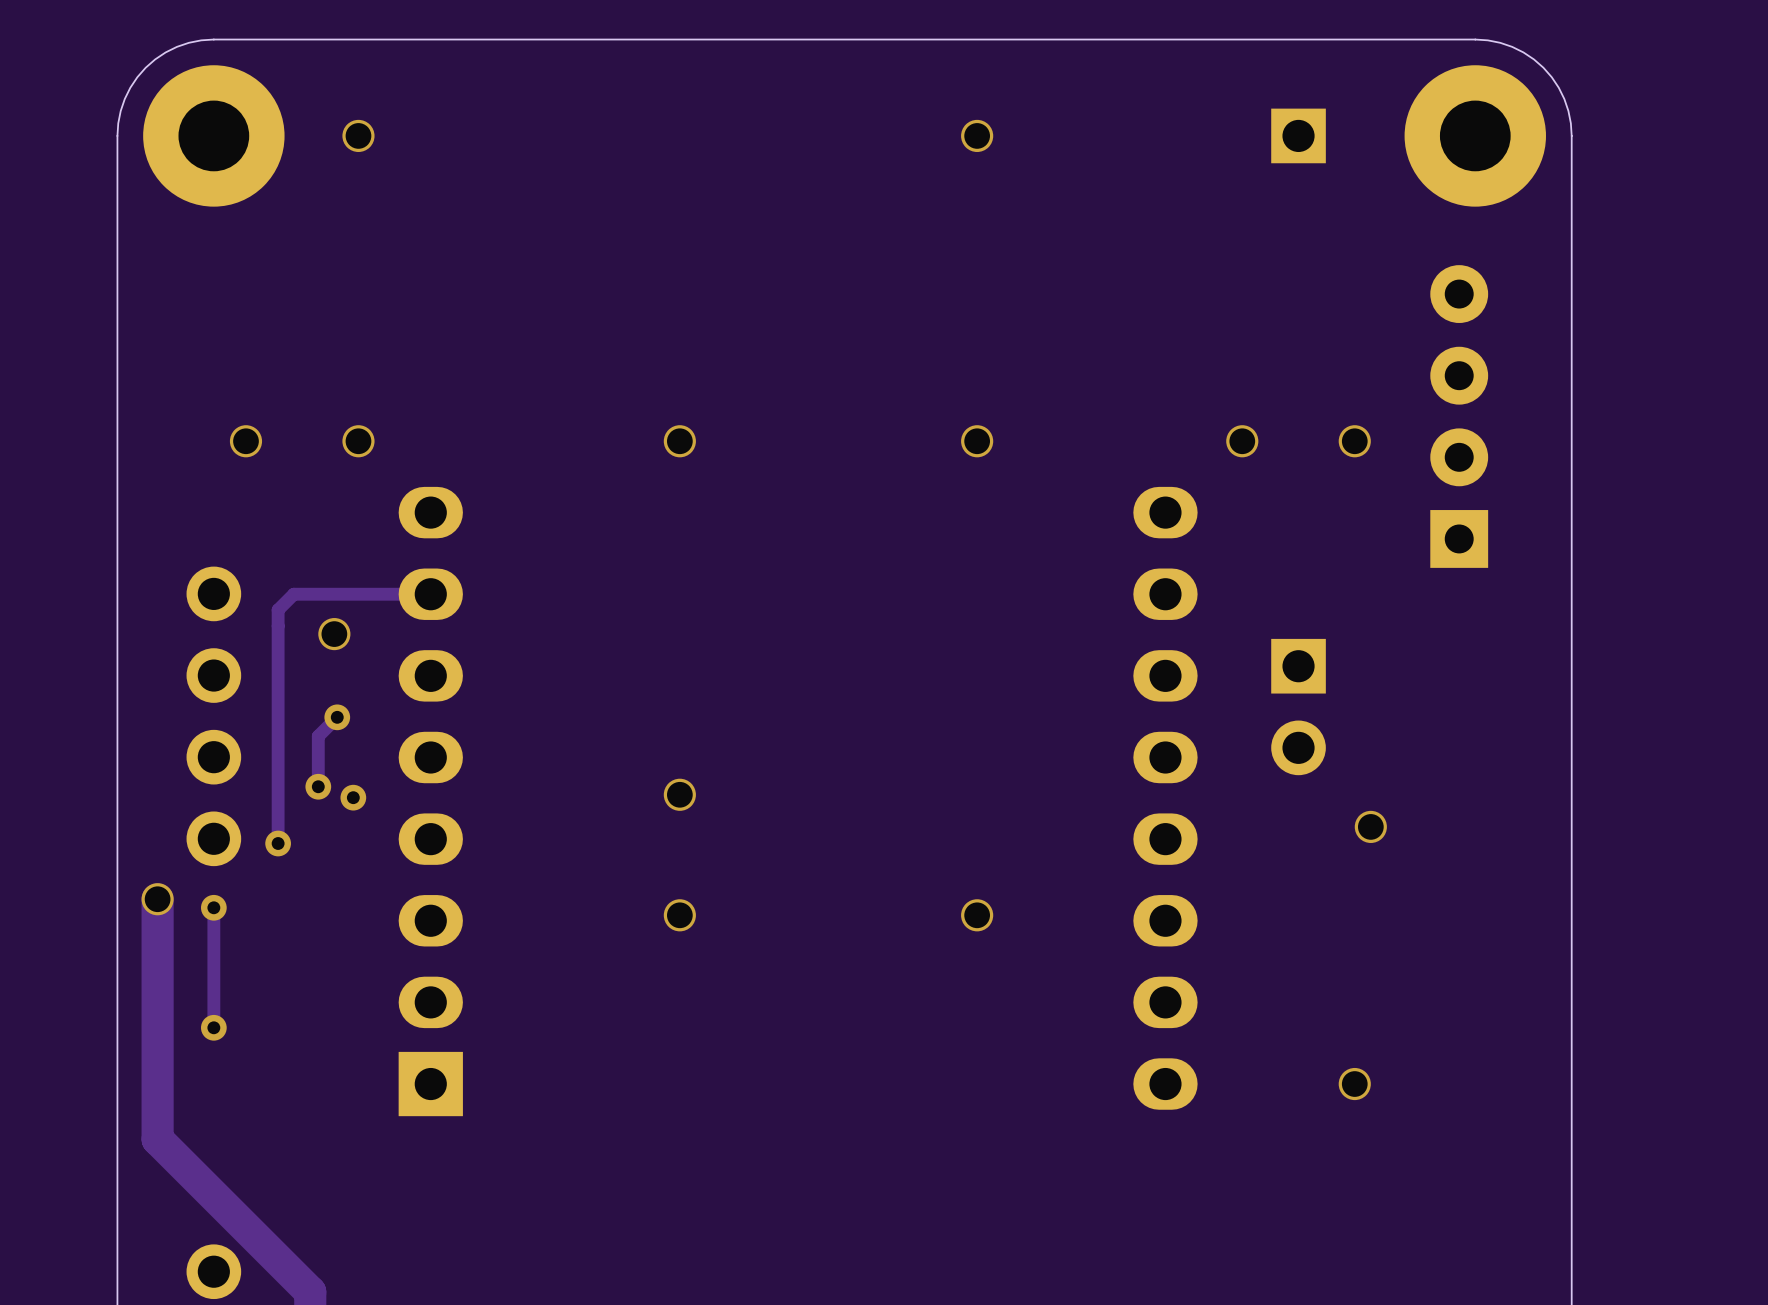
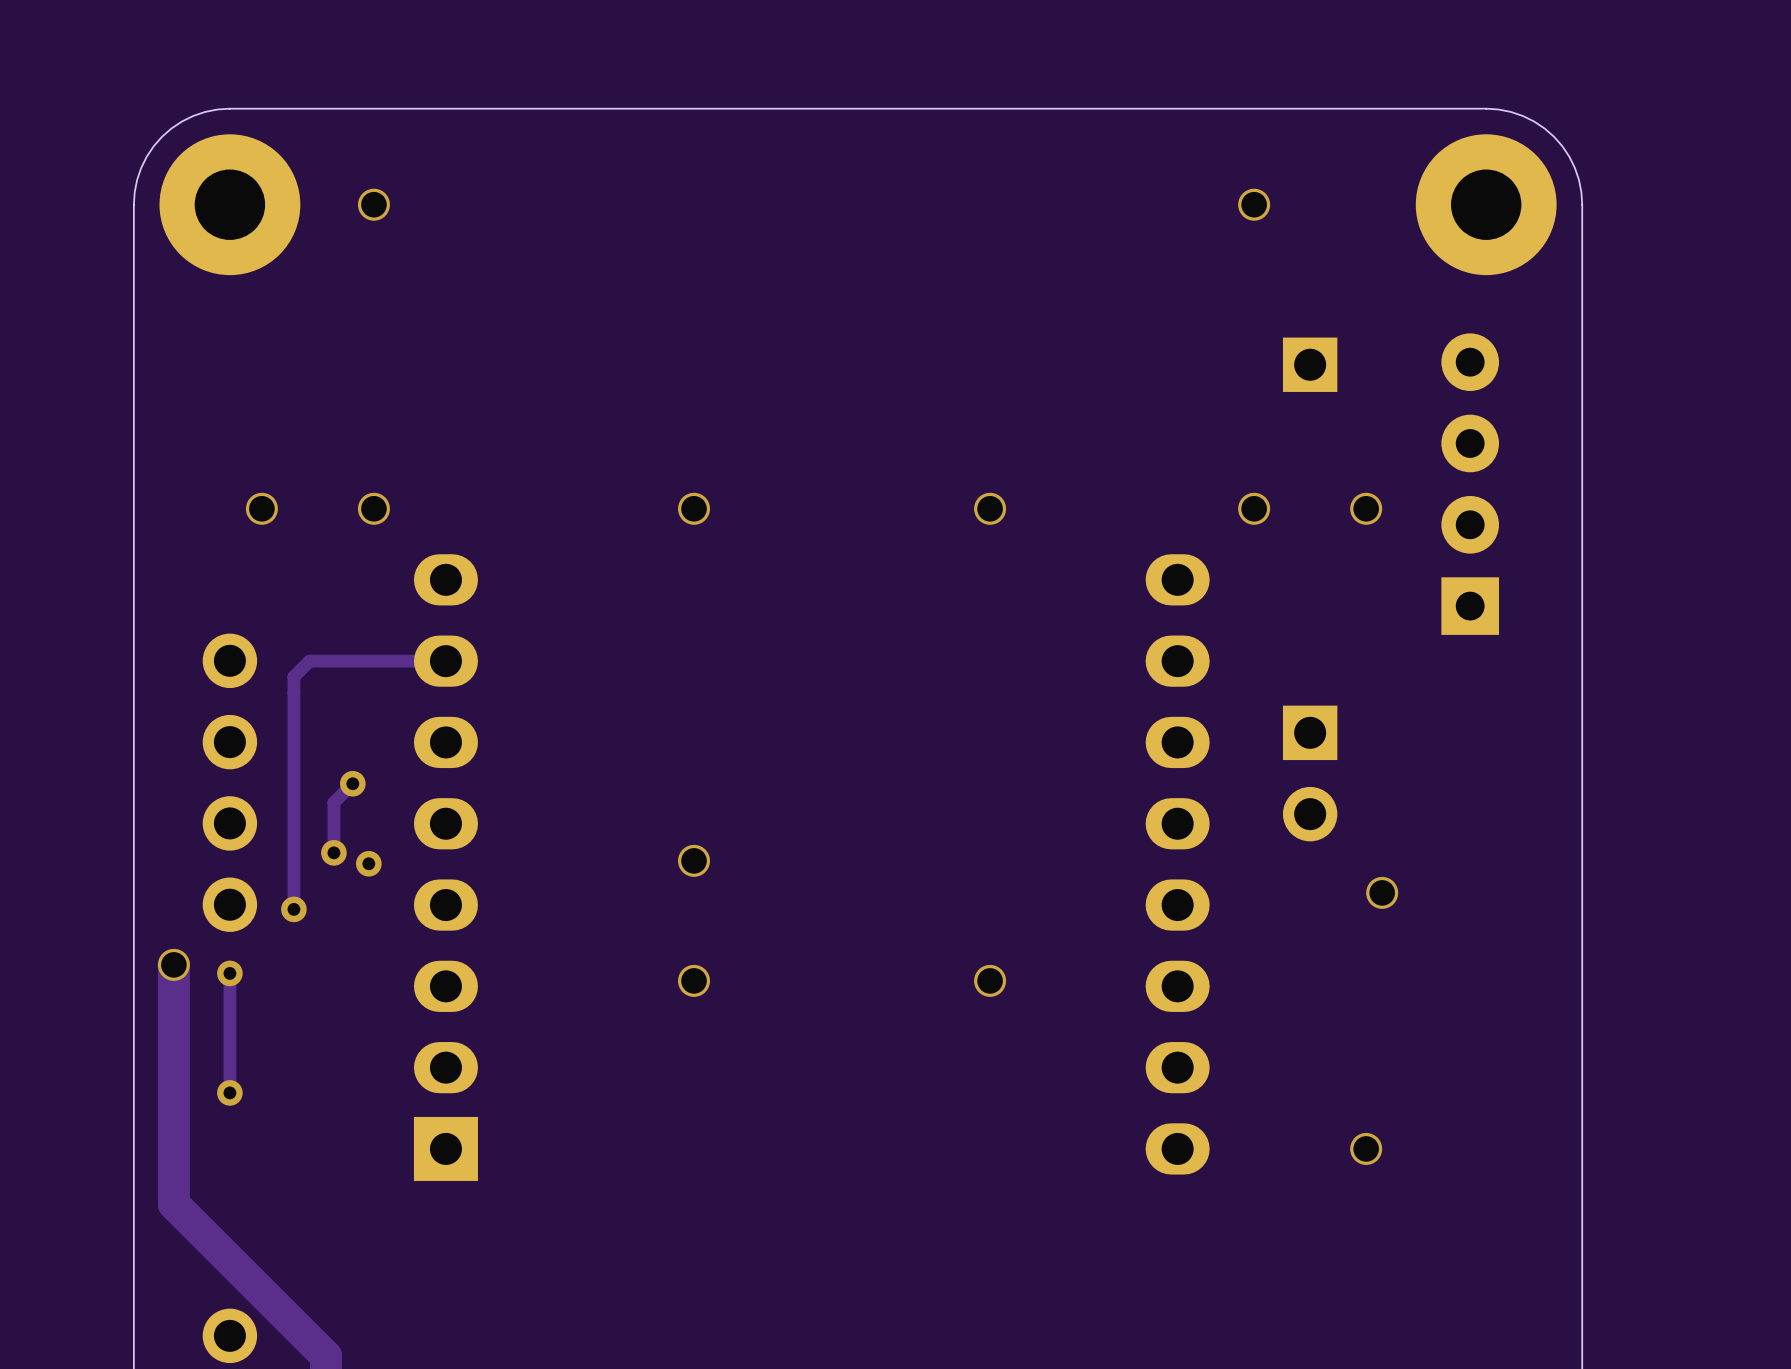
via: (977, 135) -> none
via: none -> (1254, 204)
part position: (1298, 135) -> (1310, 364)
via: (334, 634) -> none

